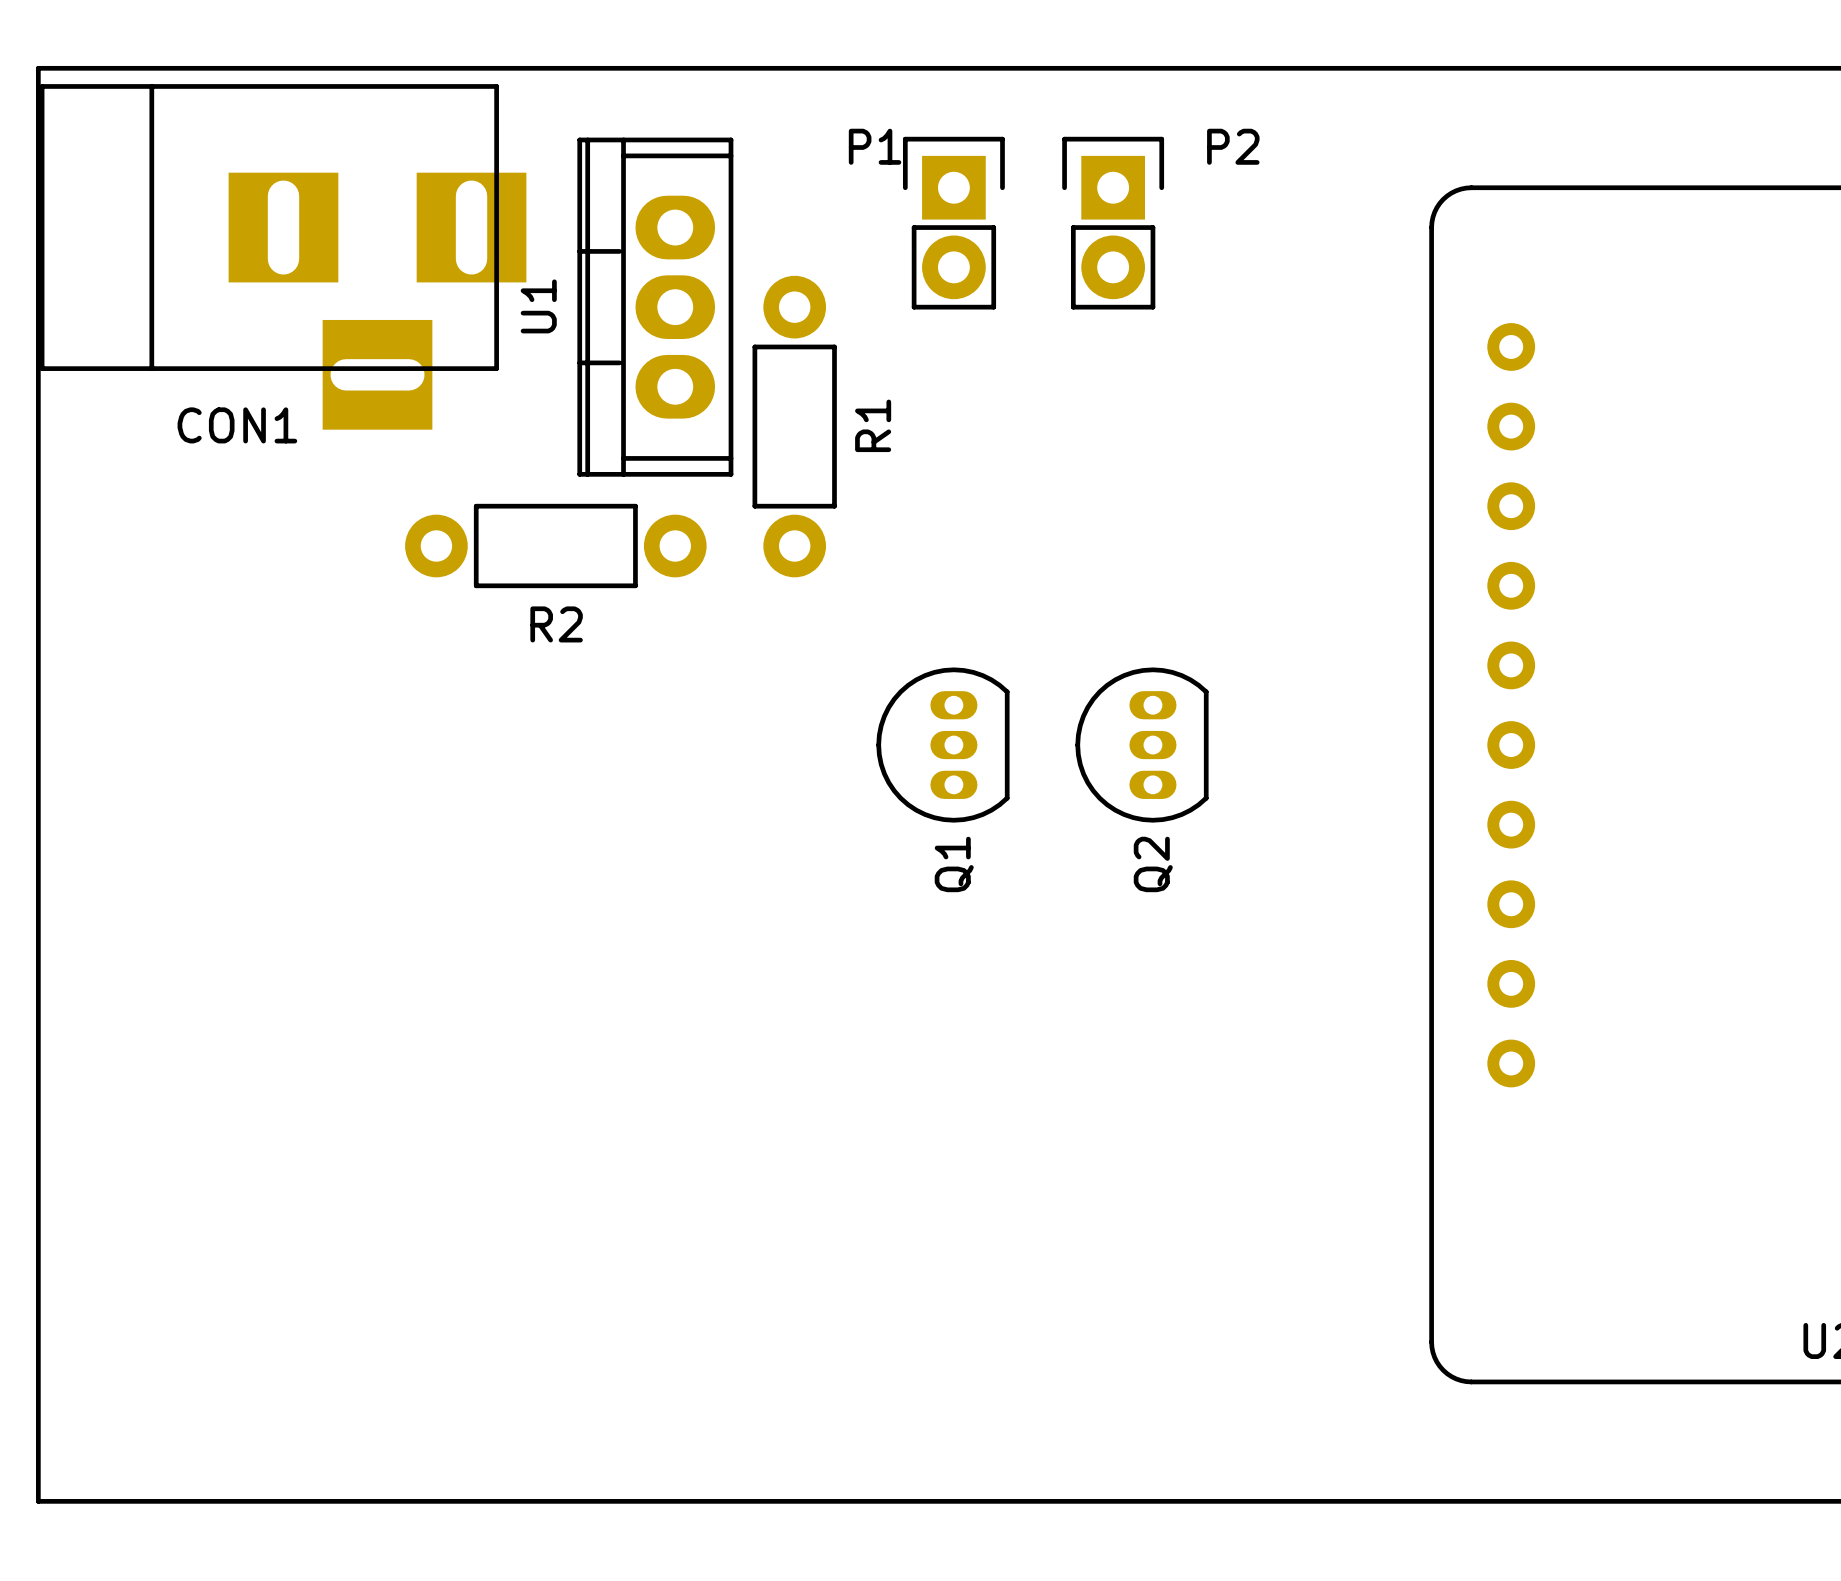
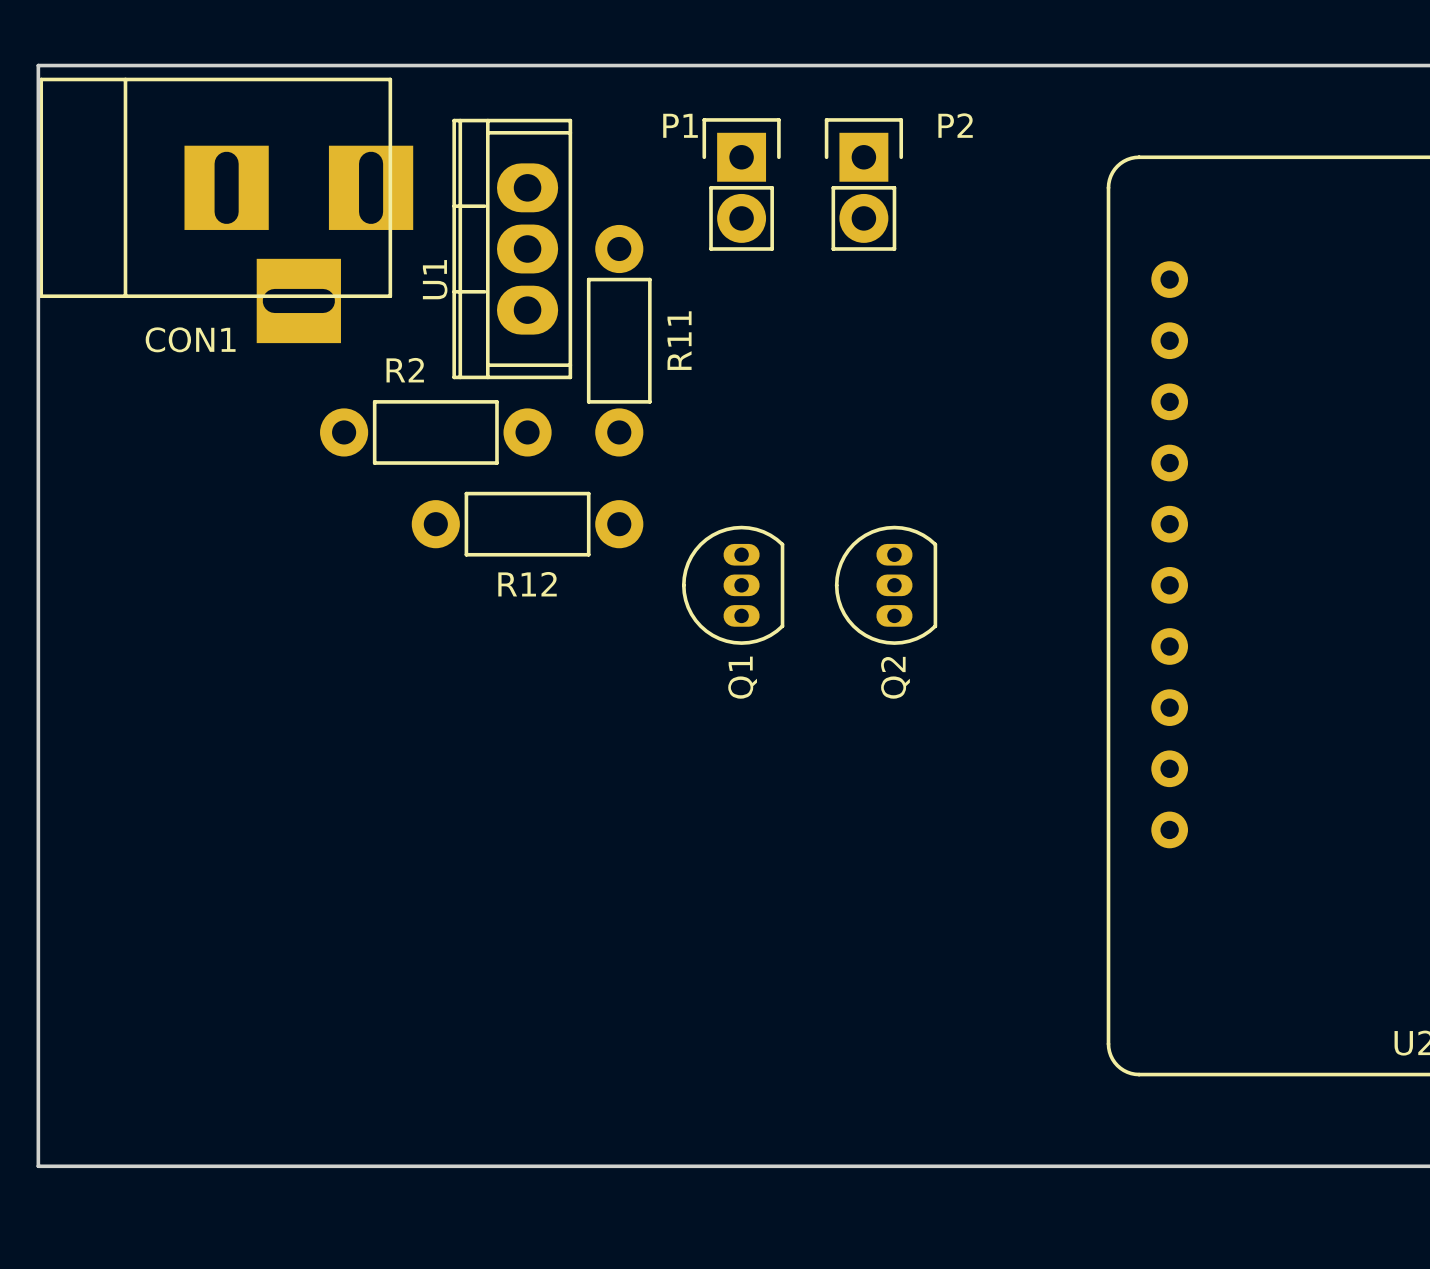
U1 name position: U1 (538, 306) -> U1 (435, 279)
R1 name: R1 (873, 425) -> R11 (679, 340)
R2 name position: R2 (556, 624) -> R2 (405, 370)
R12: none -> (527, 524)

